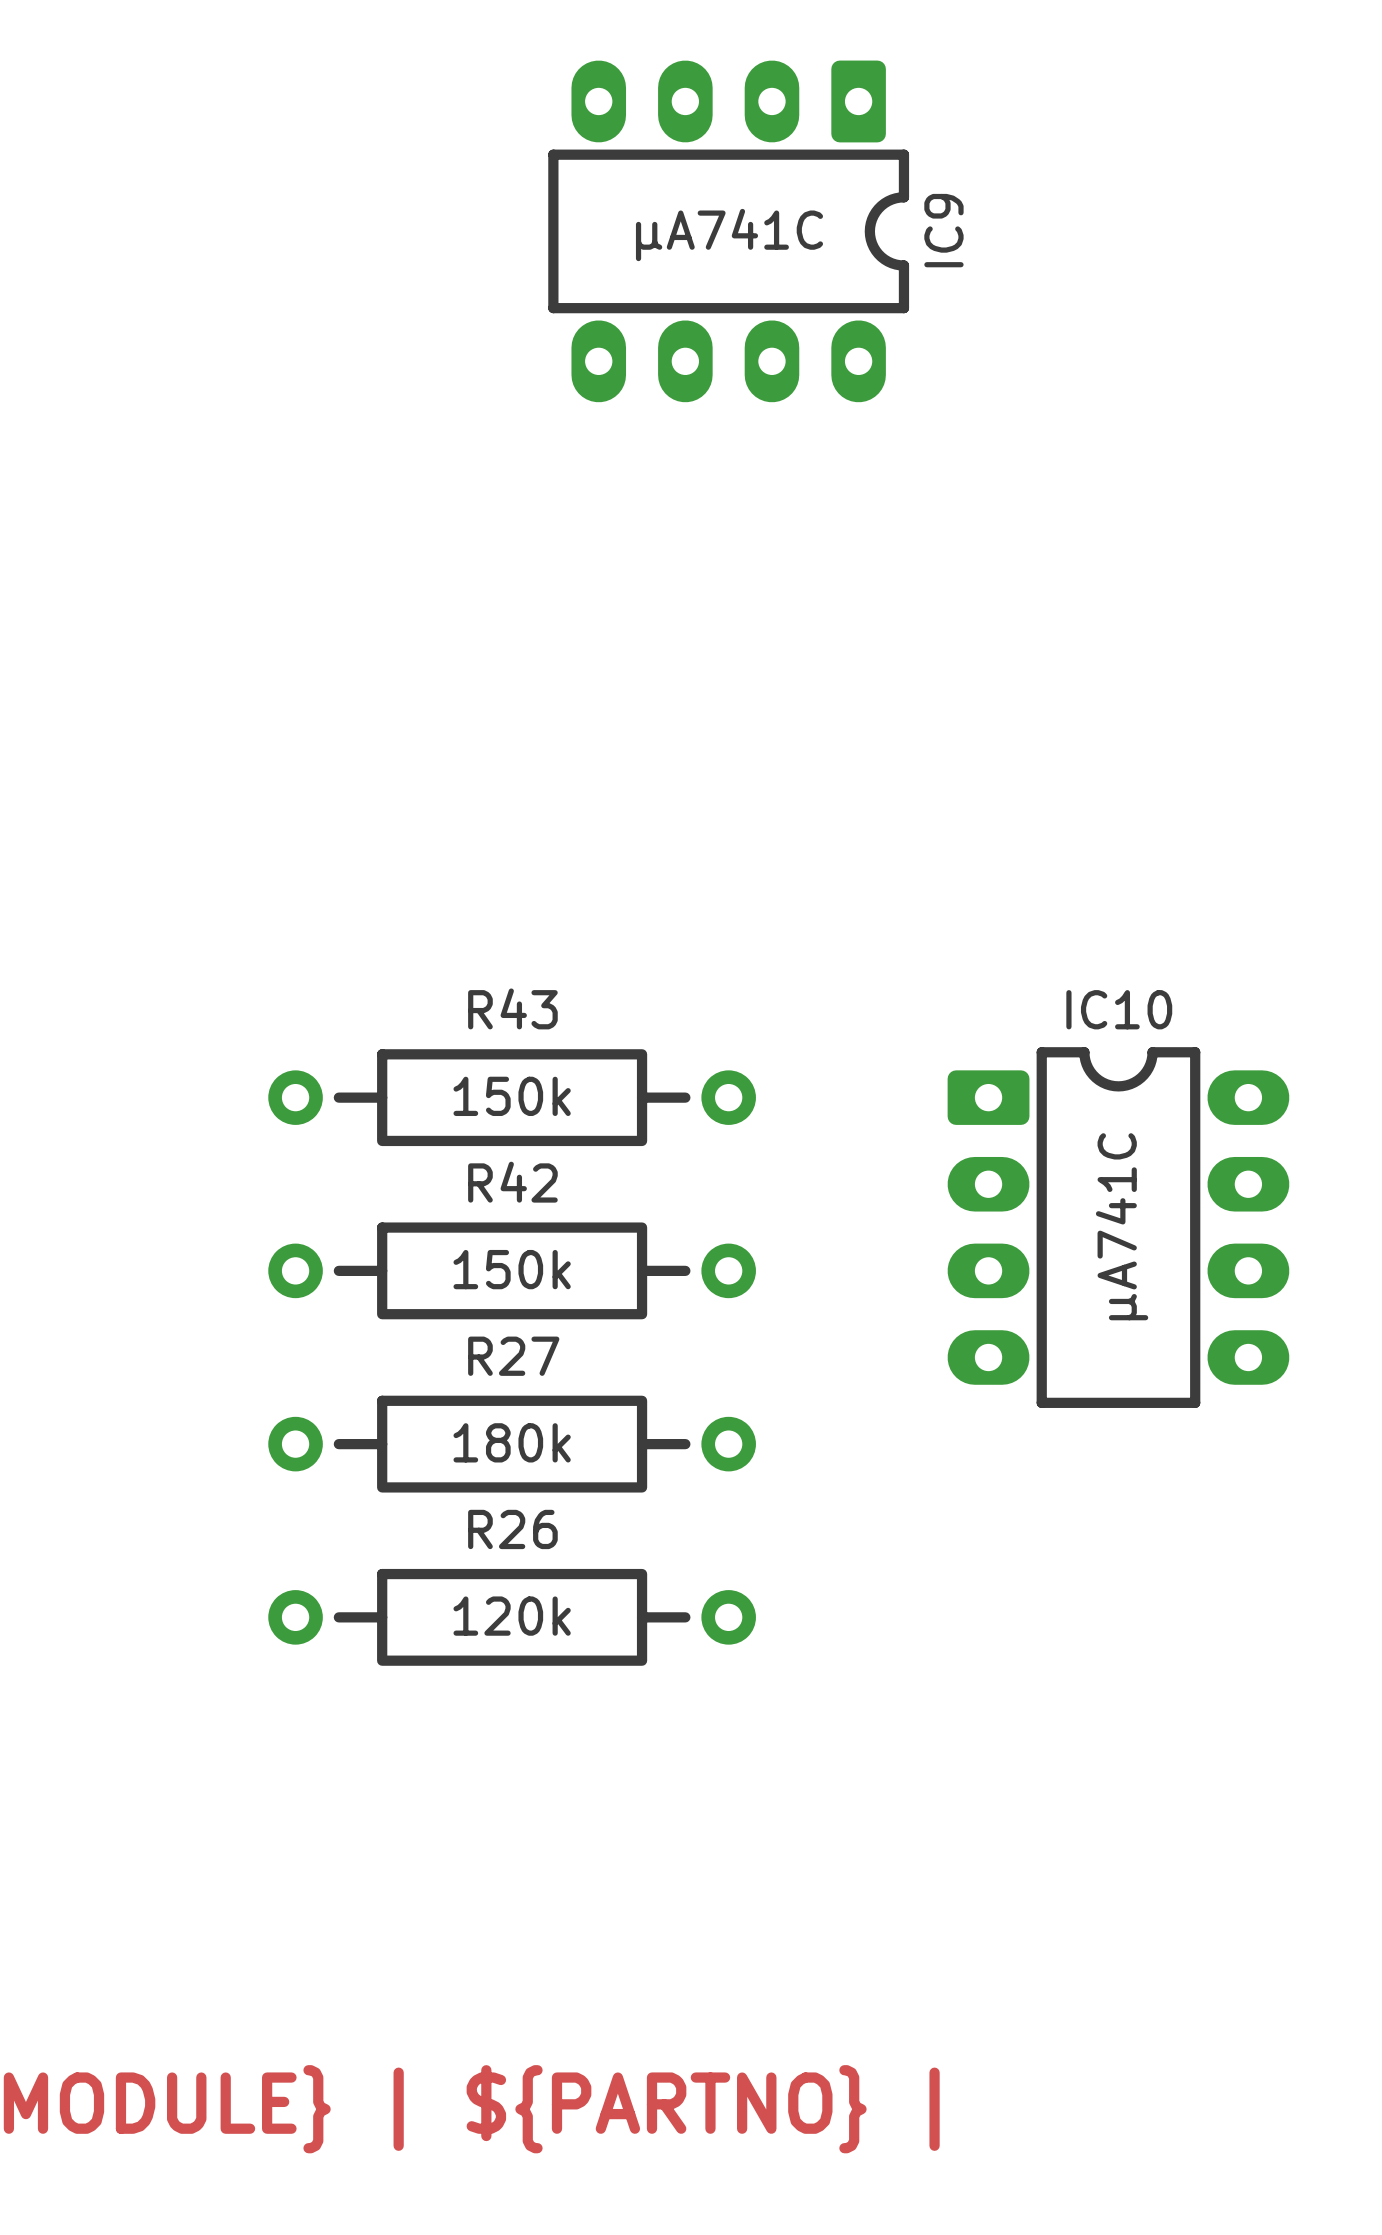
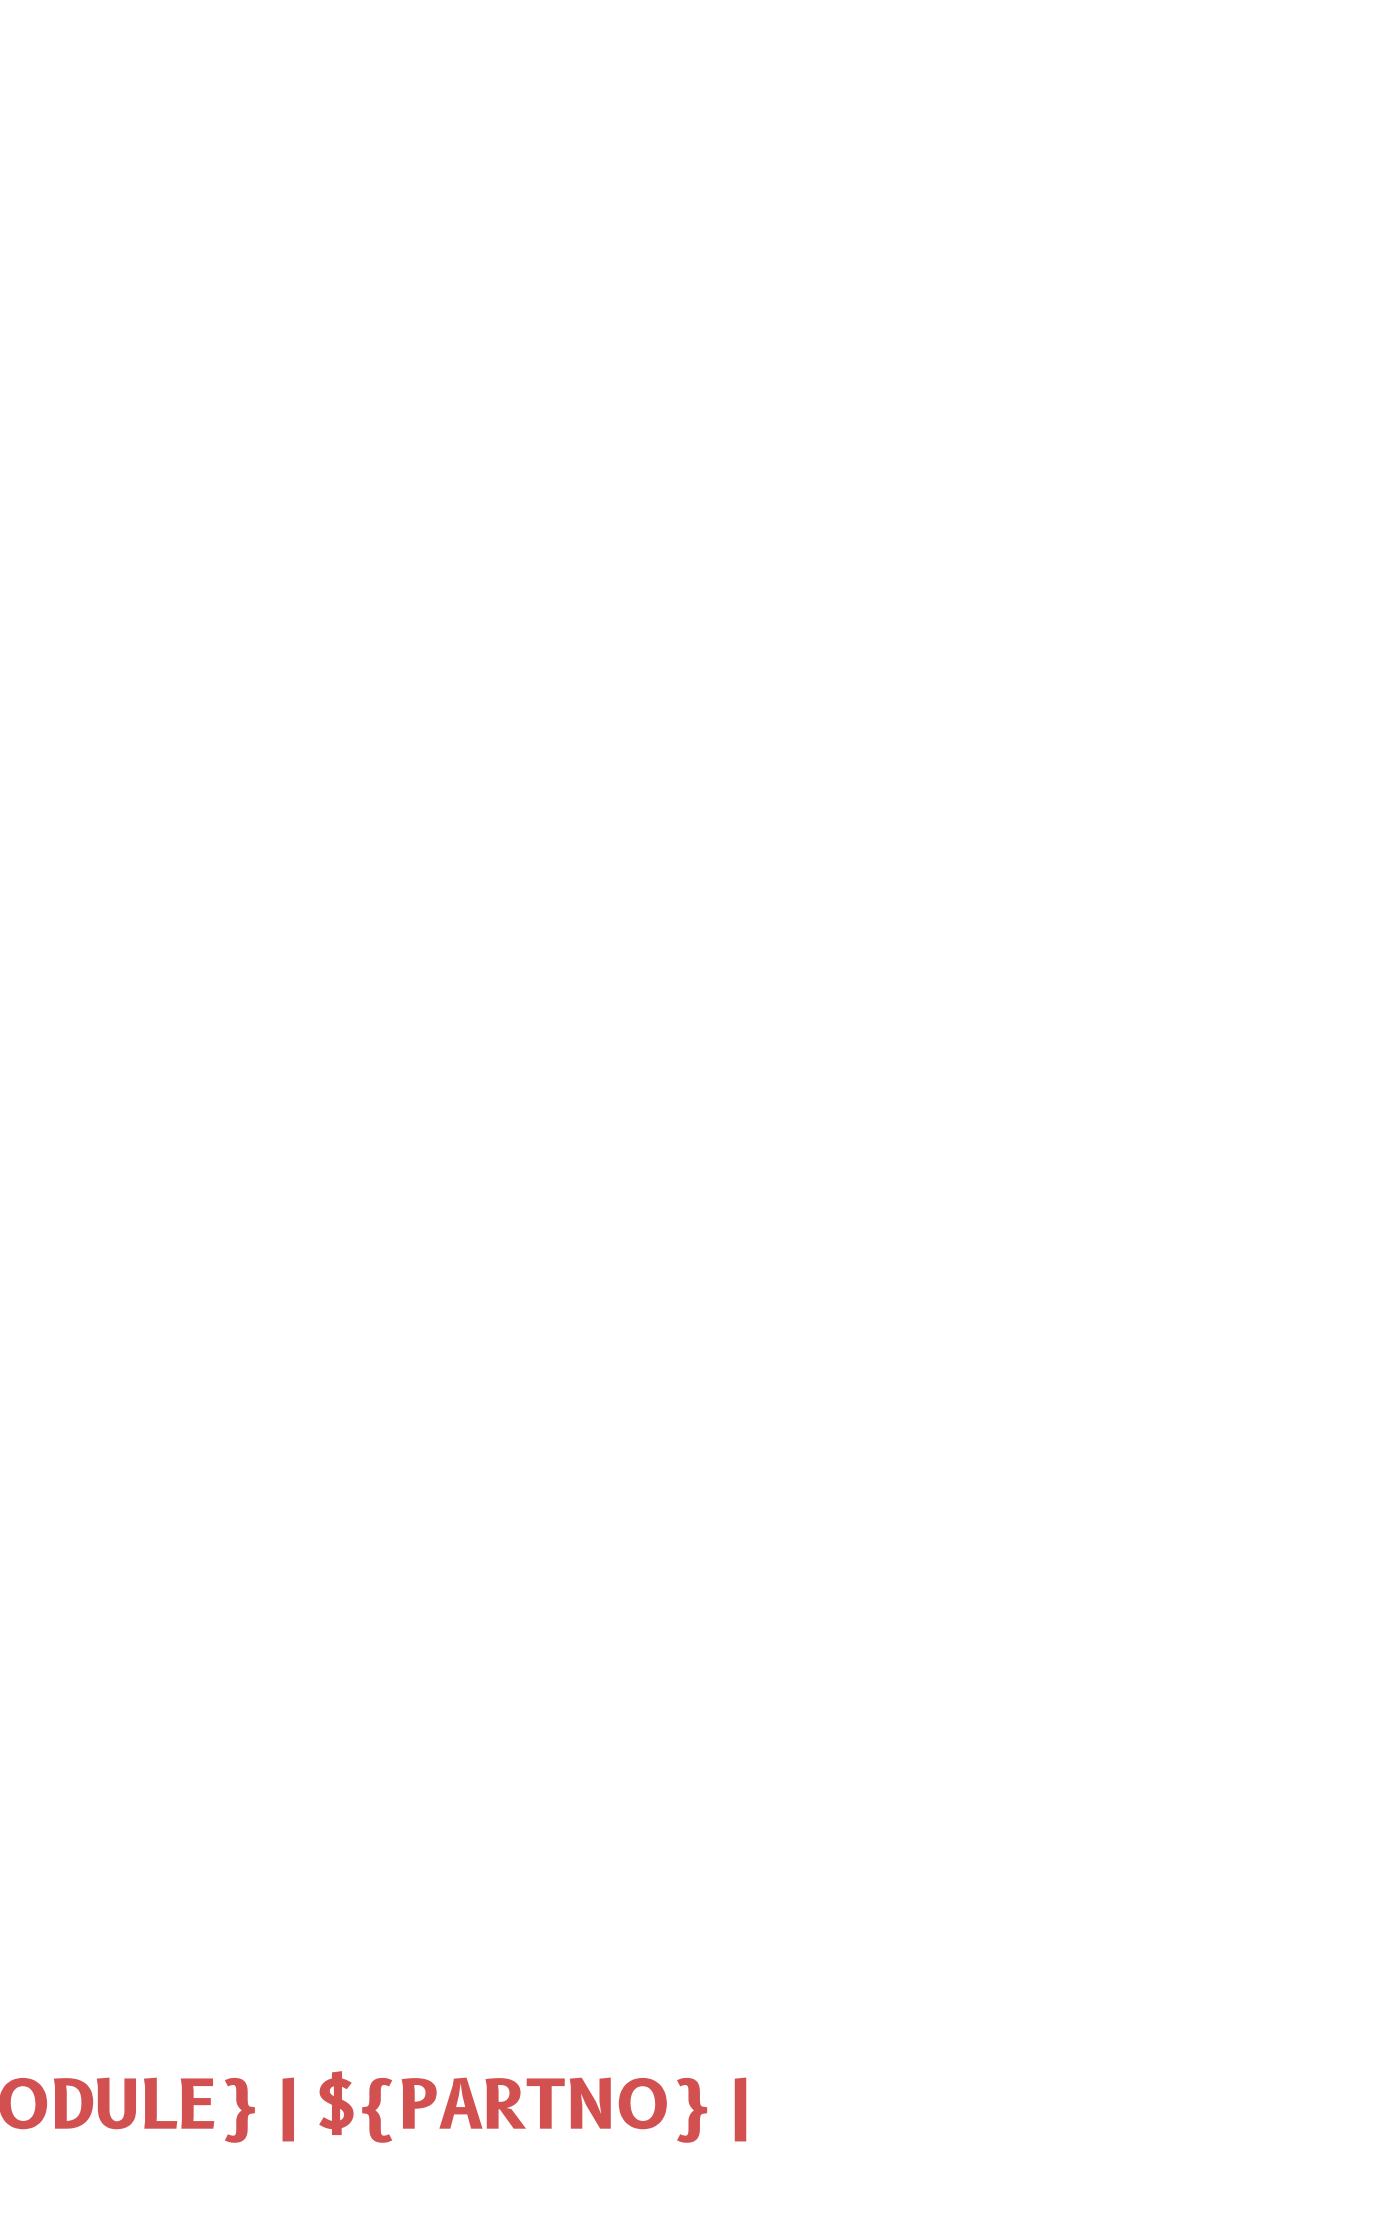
IC9: µA741C (728, 231) -> none
R43: 150k (512, 1097) -> none
IC10: µA741C (1118, 1227) -> none
R42: 150k (512, 1270) -> none
R27: 180k (512, 1444) -> none
R26: 120k (512, 1617) -> none

